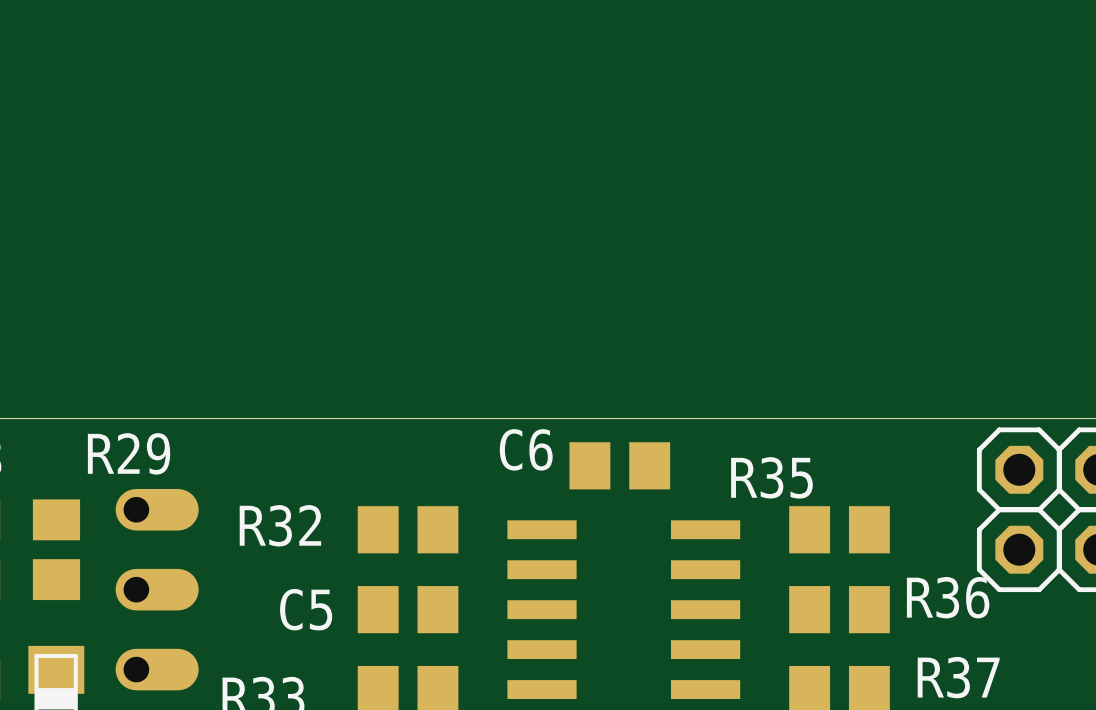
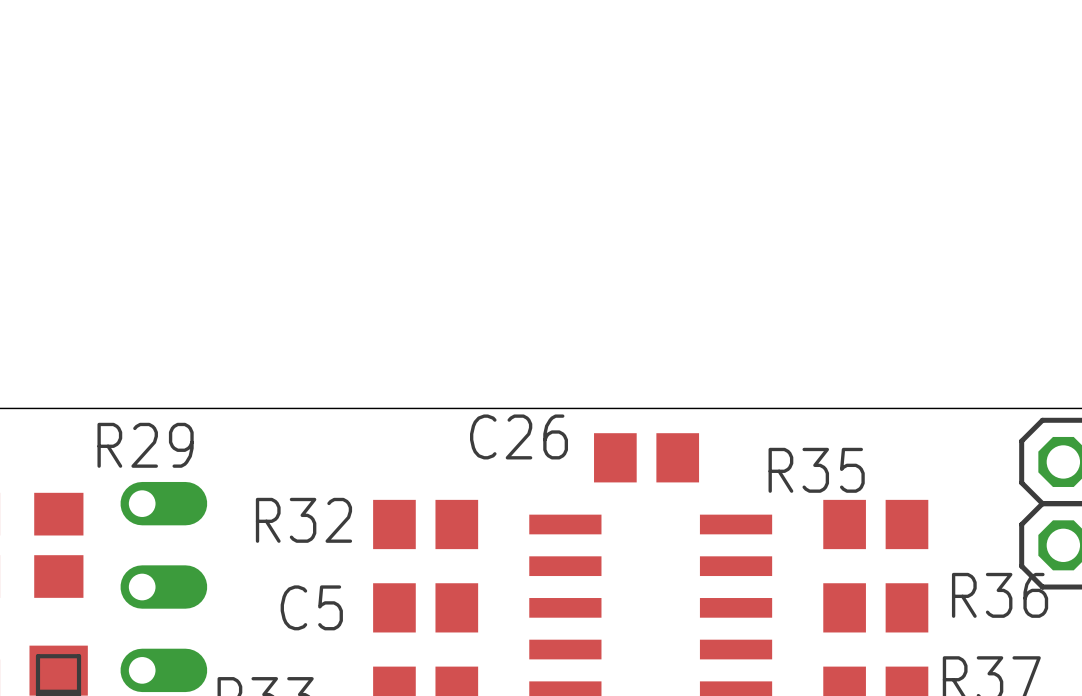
C6 name: C6 (526, 449) -> C26 (519, 436)

